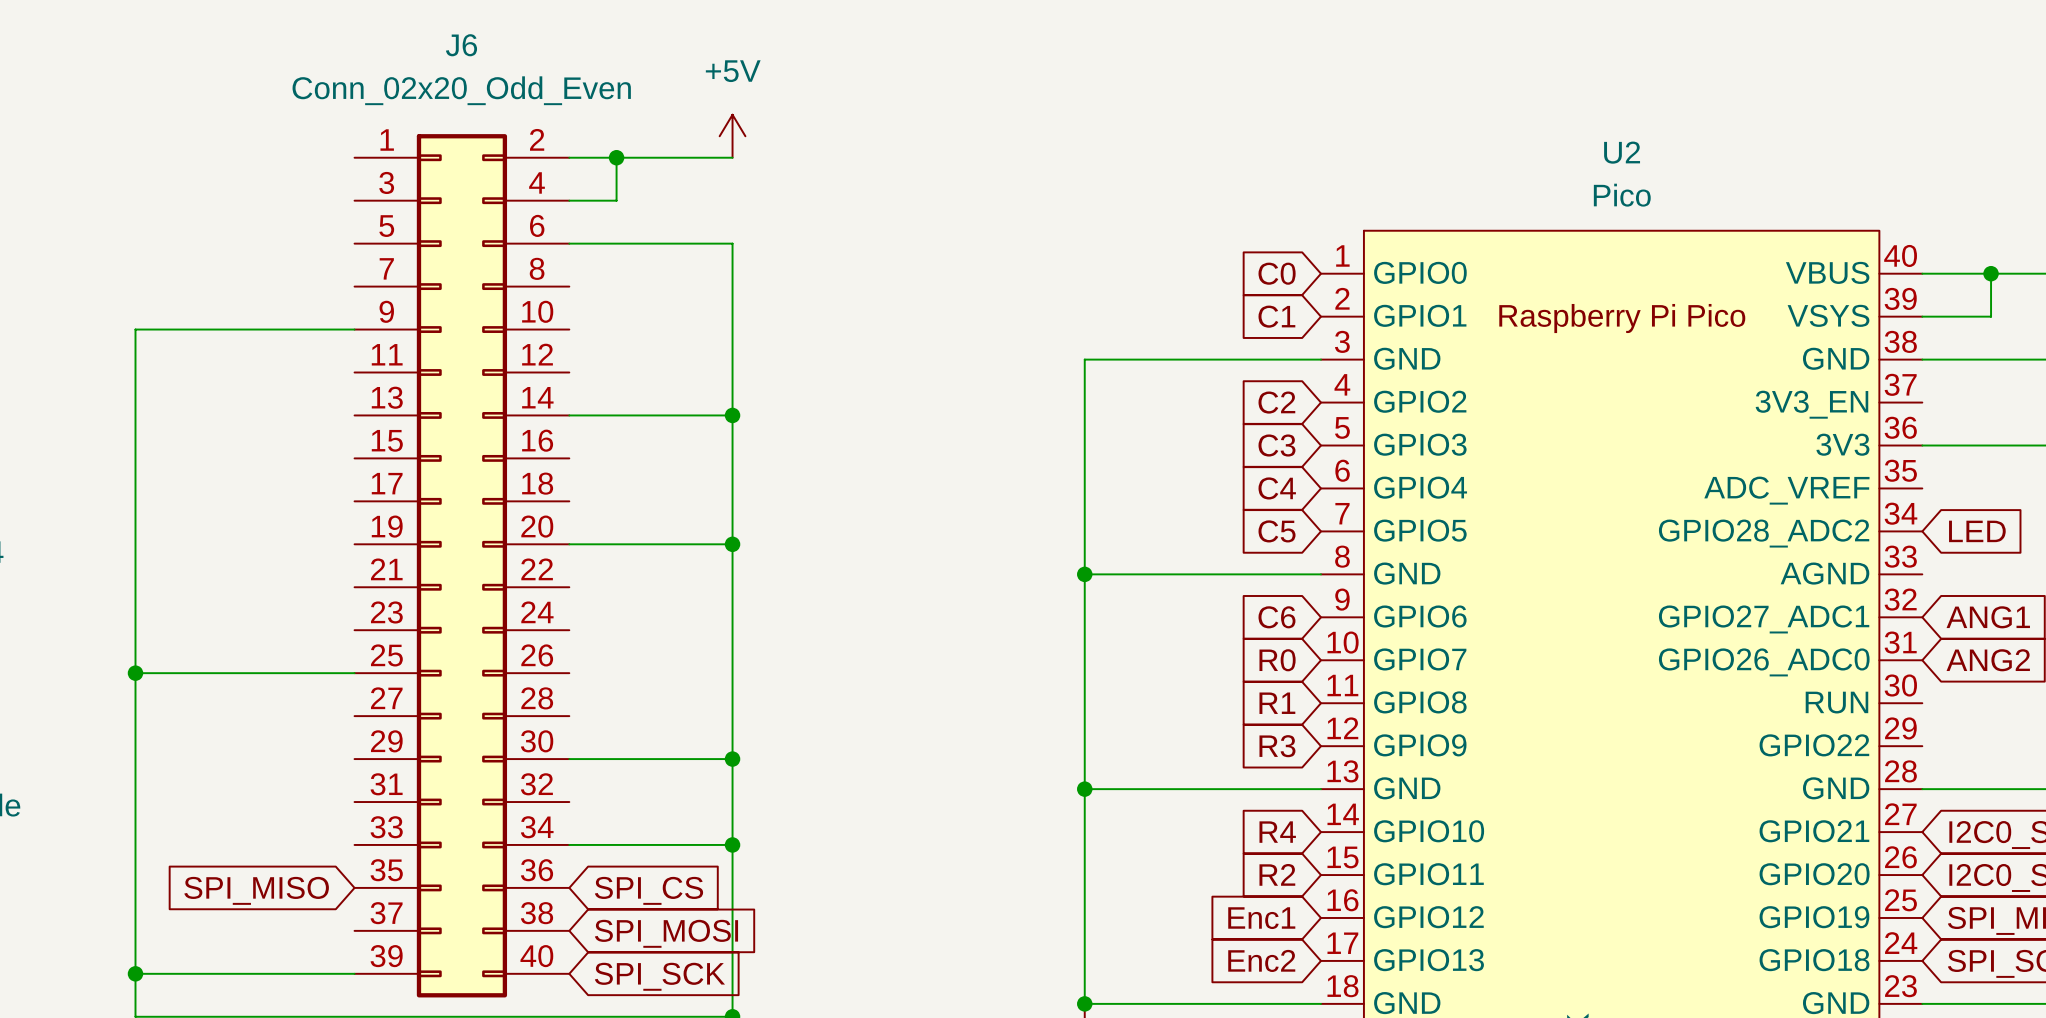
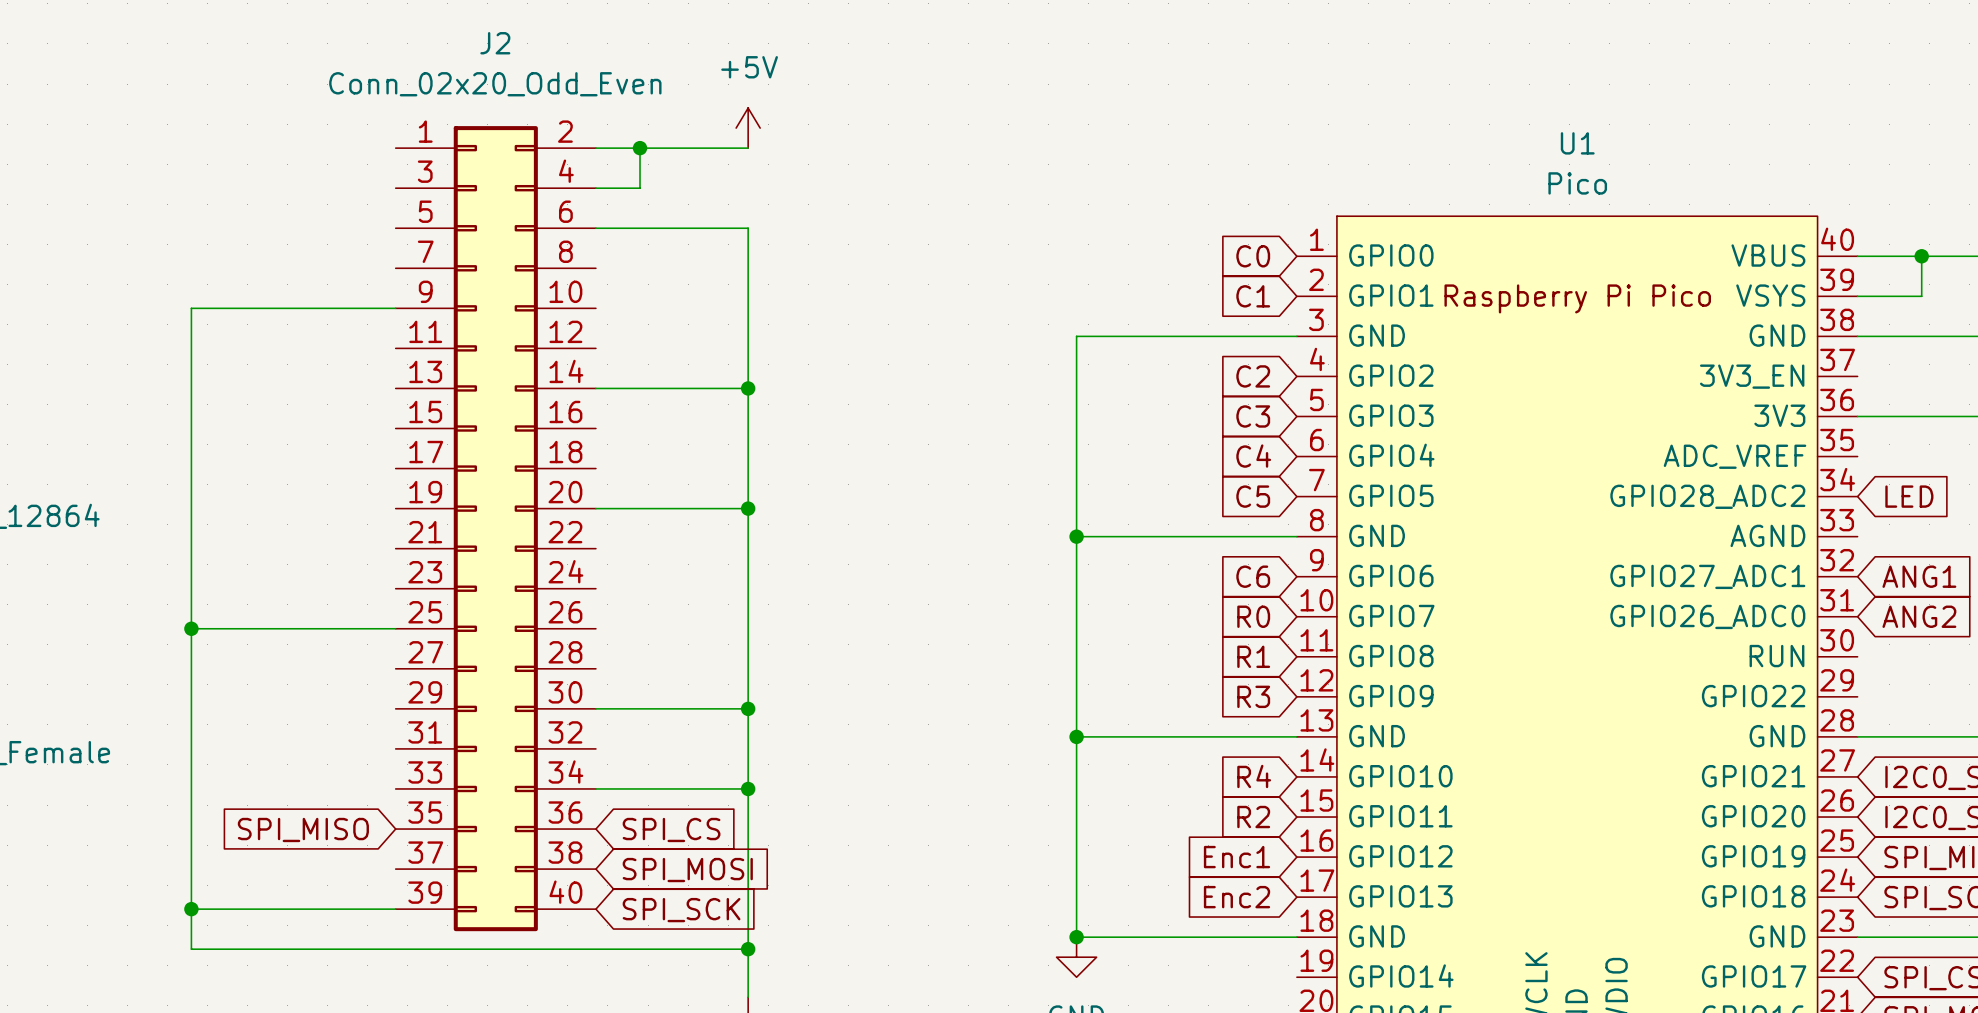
J6 name: J6 (461, 45) -> J2 (495, 43)
U2 name: U2 (1622, 152) -> U1 (1577, 143)

